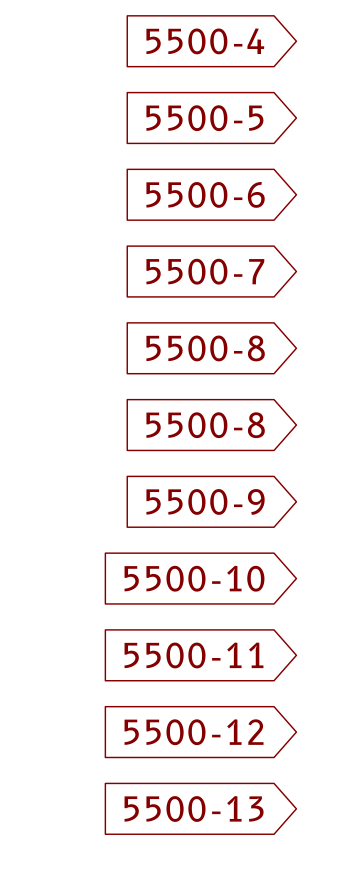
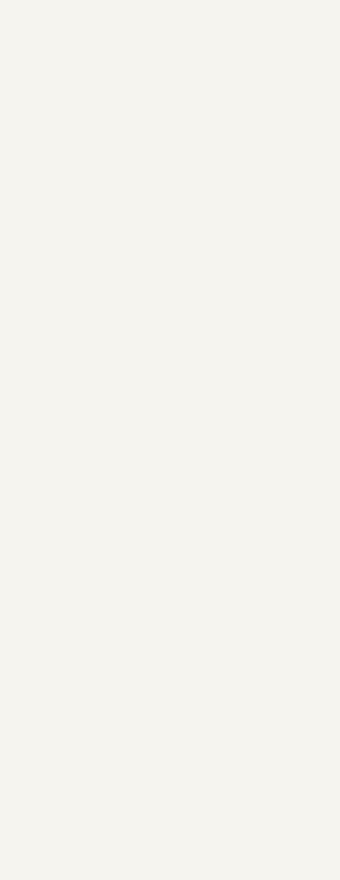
global label: 5500-4 (205, 41) -> none
global label: 5500-5 (204, 118) -> none
global label: 5500-6 (205, 194) -> none
global label: 5500-7 (205, 271) -> none
global label: 5500-8 (205, 348) -> none
global label: 5500-8 (205, 425) -> none
global label: 5500-9 (205, 501) -> none
global label: 5500-10 (194, 578) -> none
global label: 5500-11 (193, 655) -> none
global label: 5500-12 (194, 732) -> none
global label: 5500-13 (194, 808) -> none

